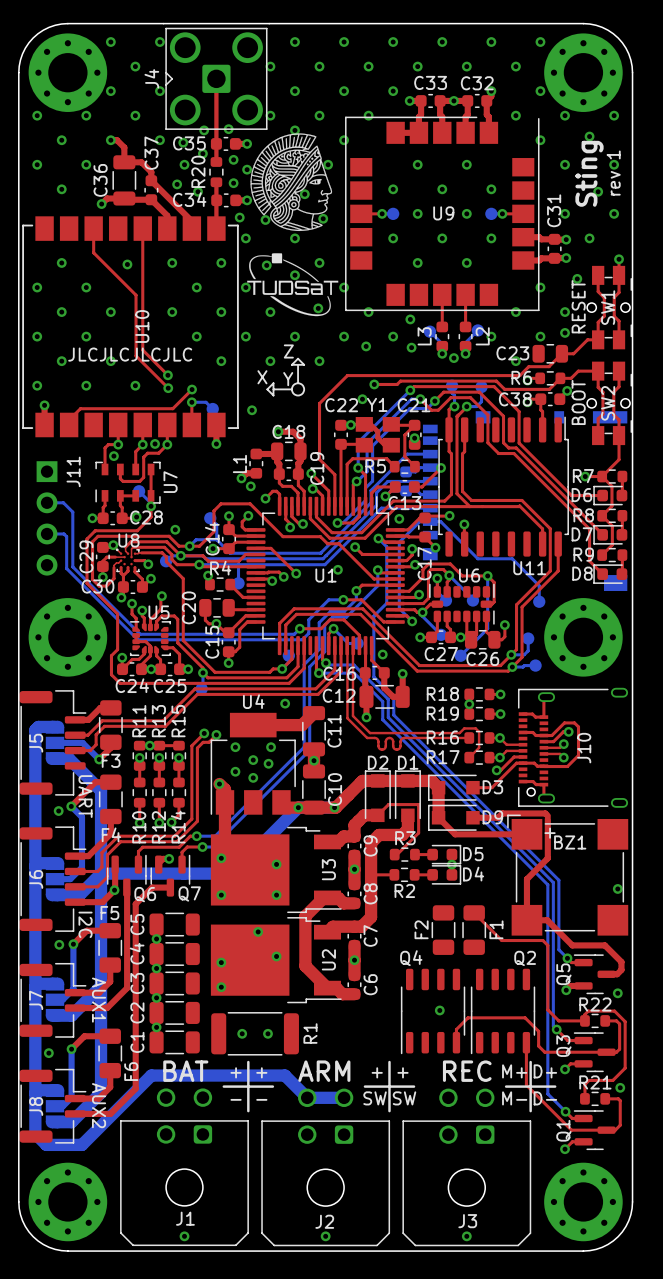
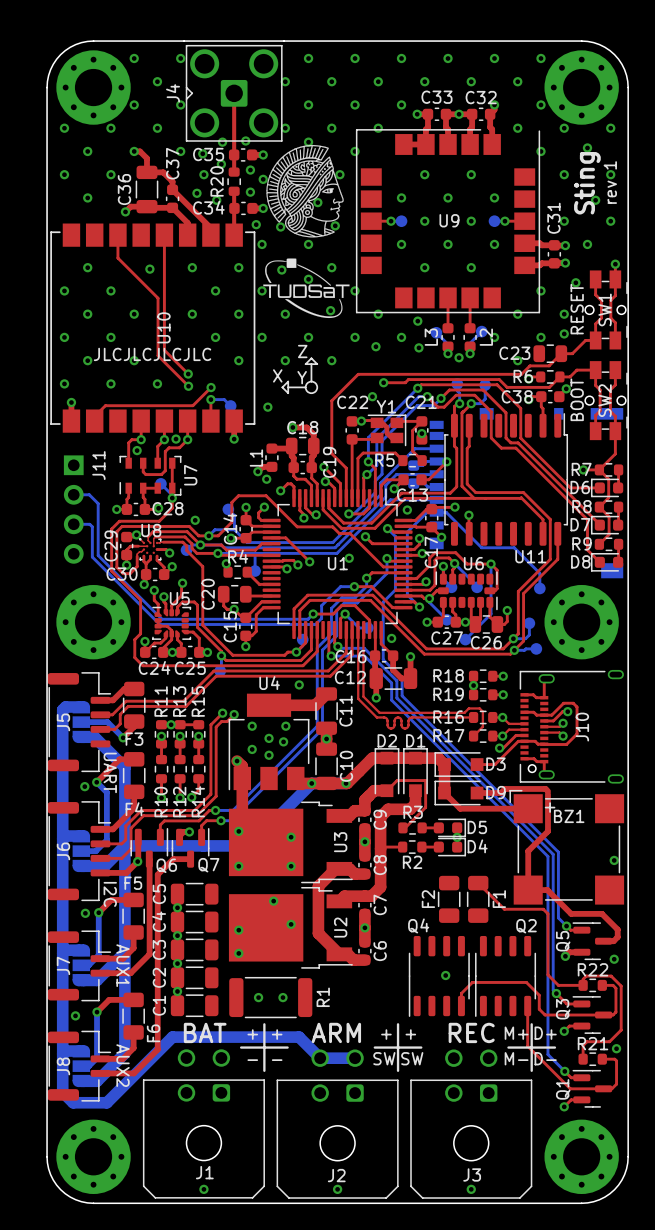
Y1 footprint: [355, 417, 400, 453] -> [367, 414, 407, 447]

